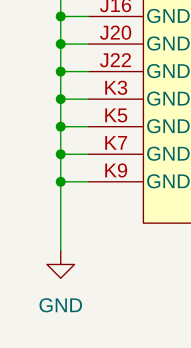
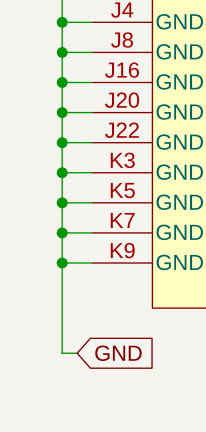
power symbol: GND (60, 264) -> none
global label: none -> GND (118, 353)

